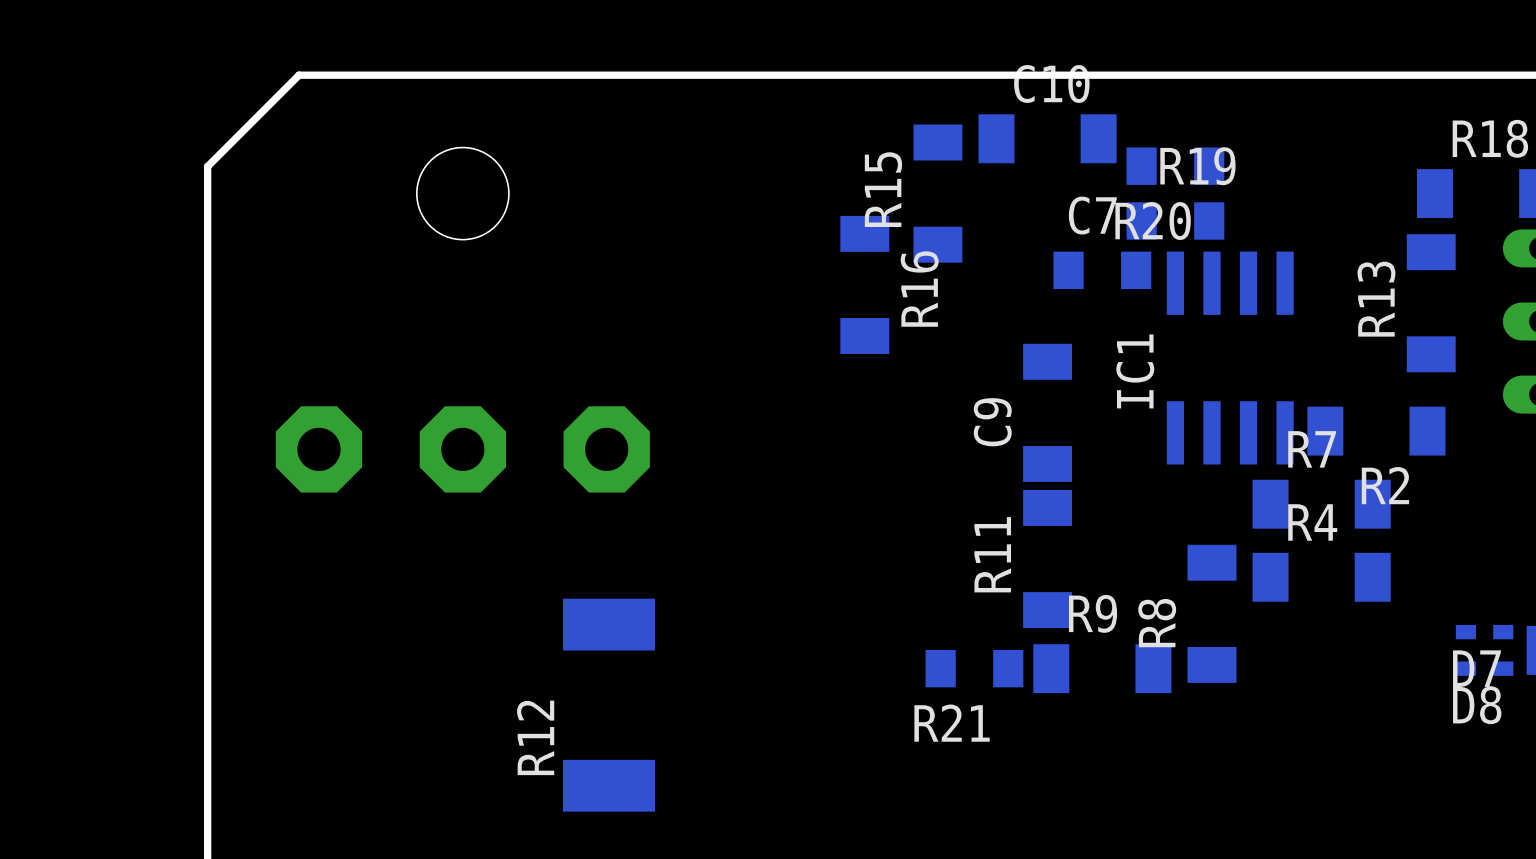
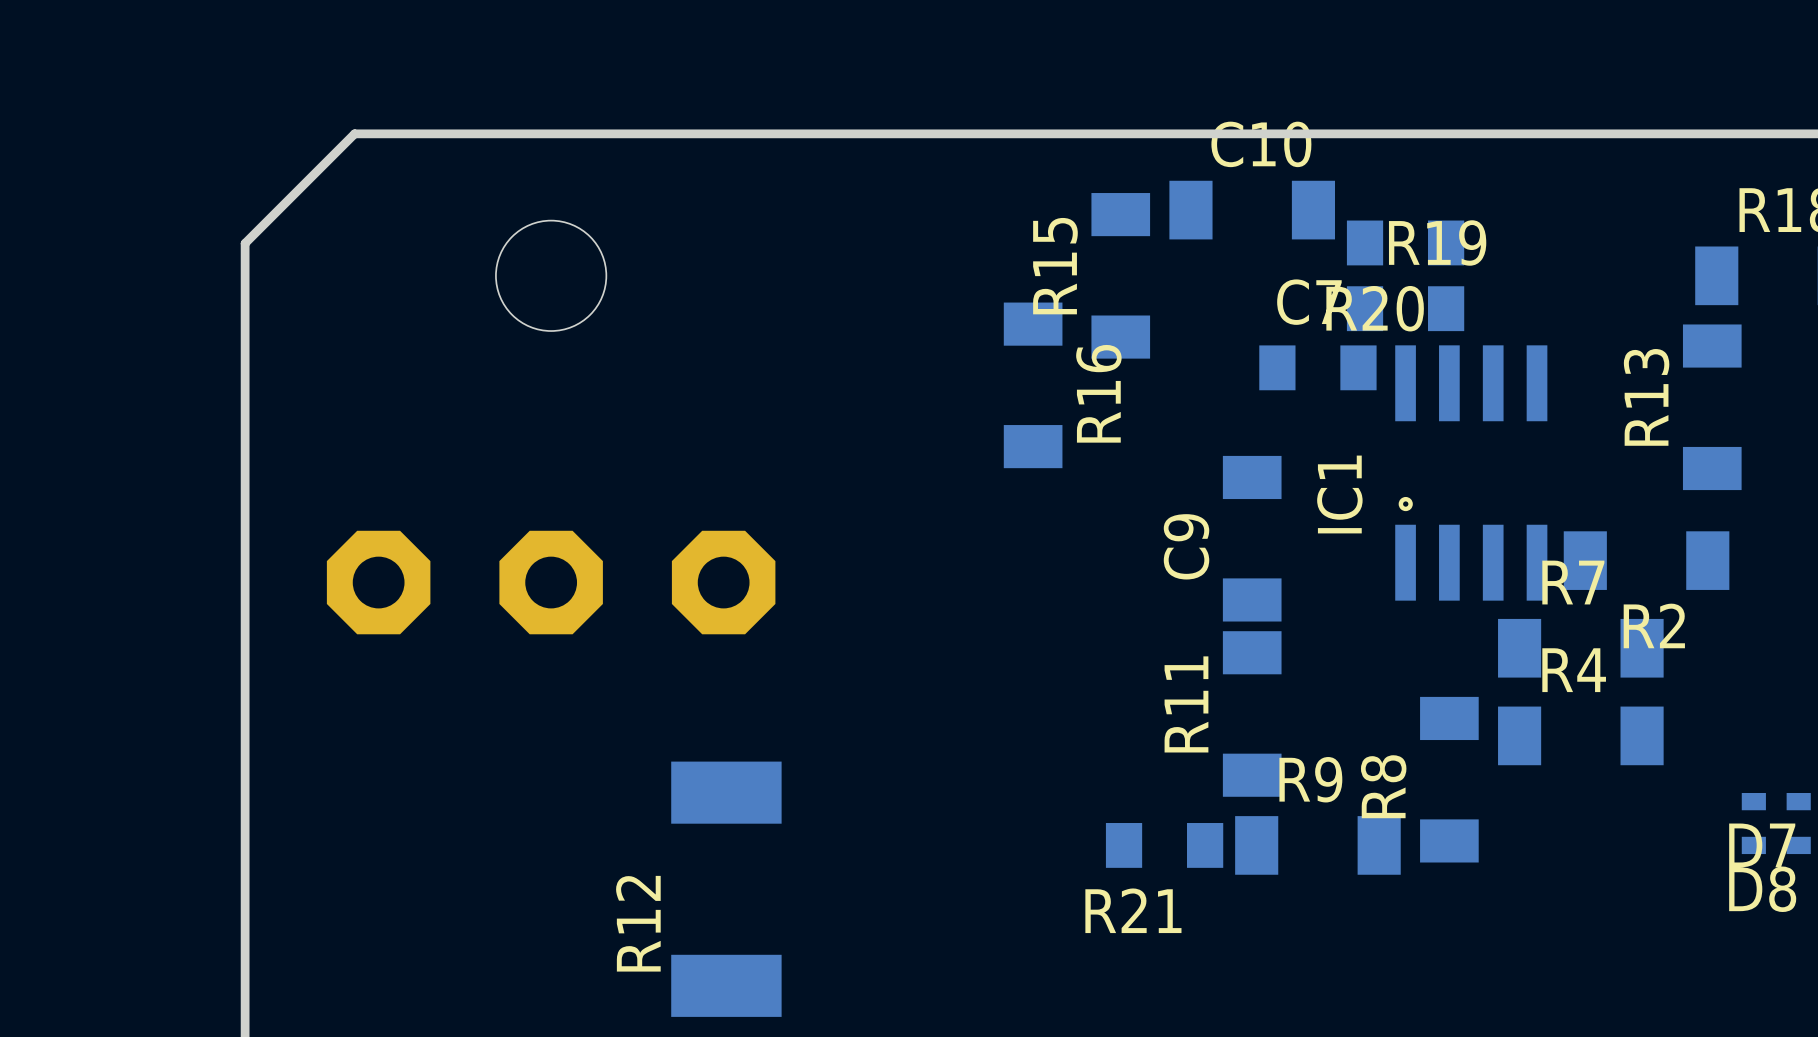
IC1 footprint: [1166, 251, 1294, 465] -> [1395, 345, 1548, 601]

